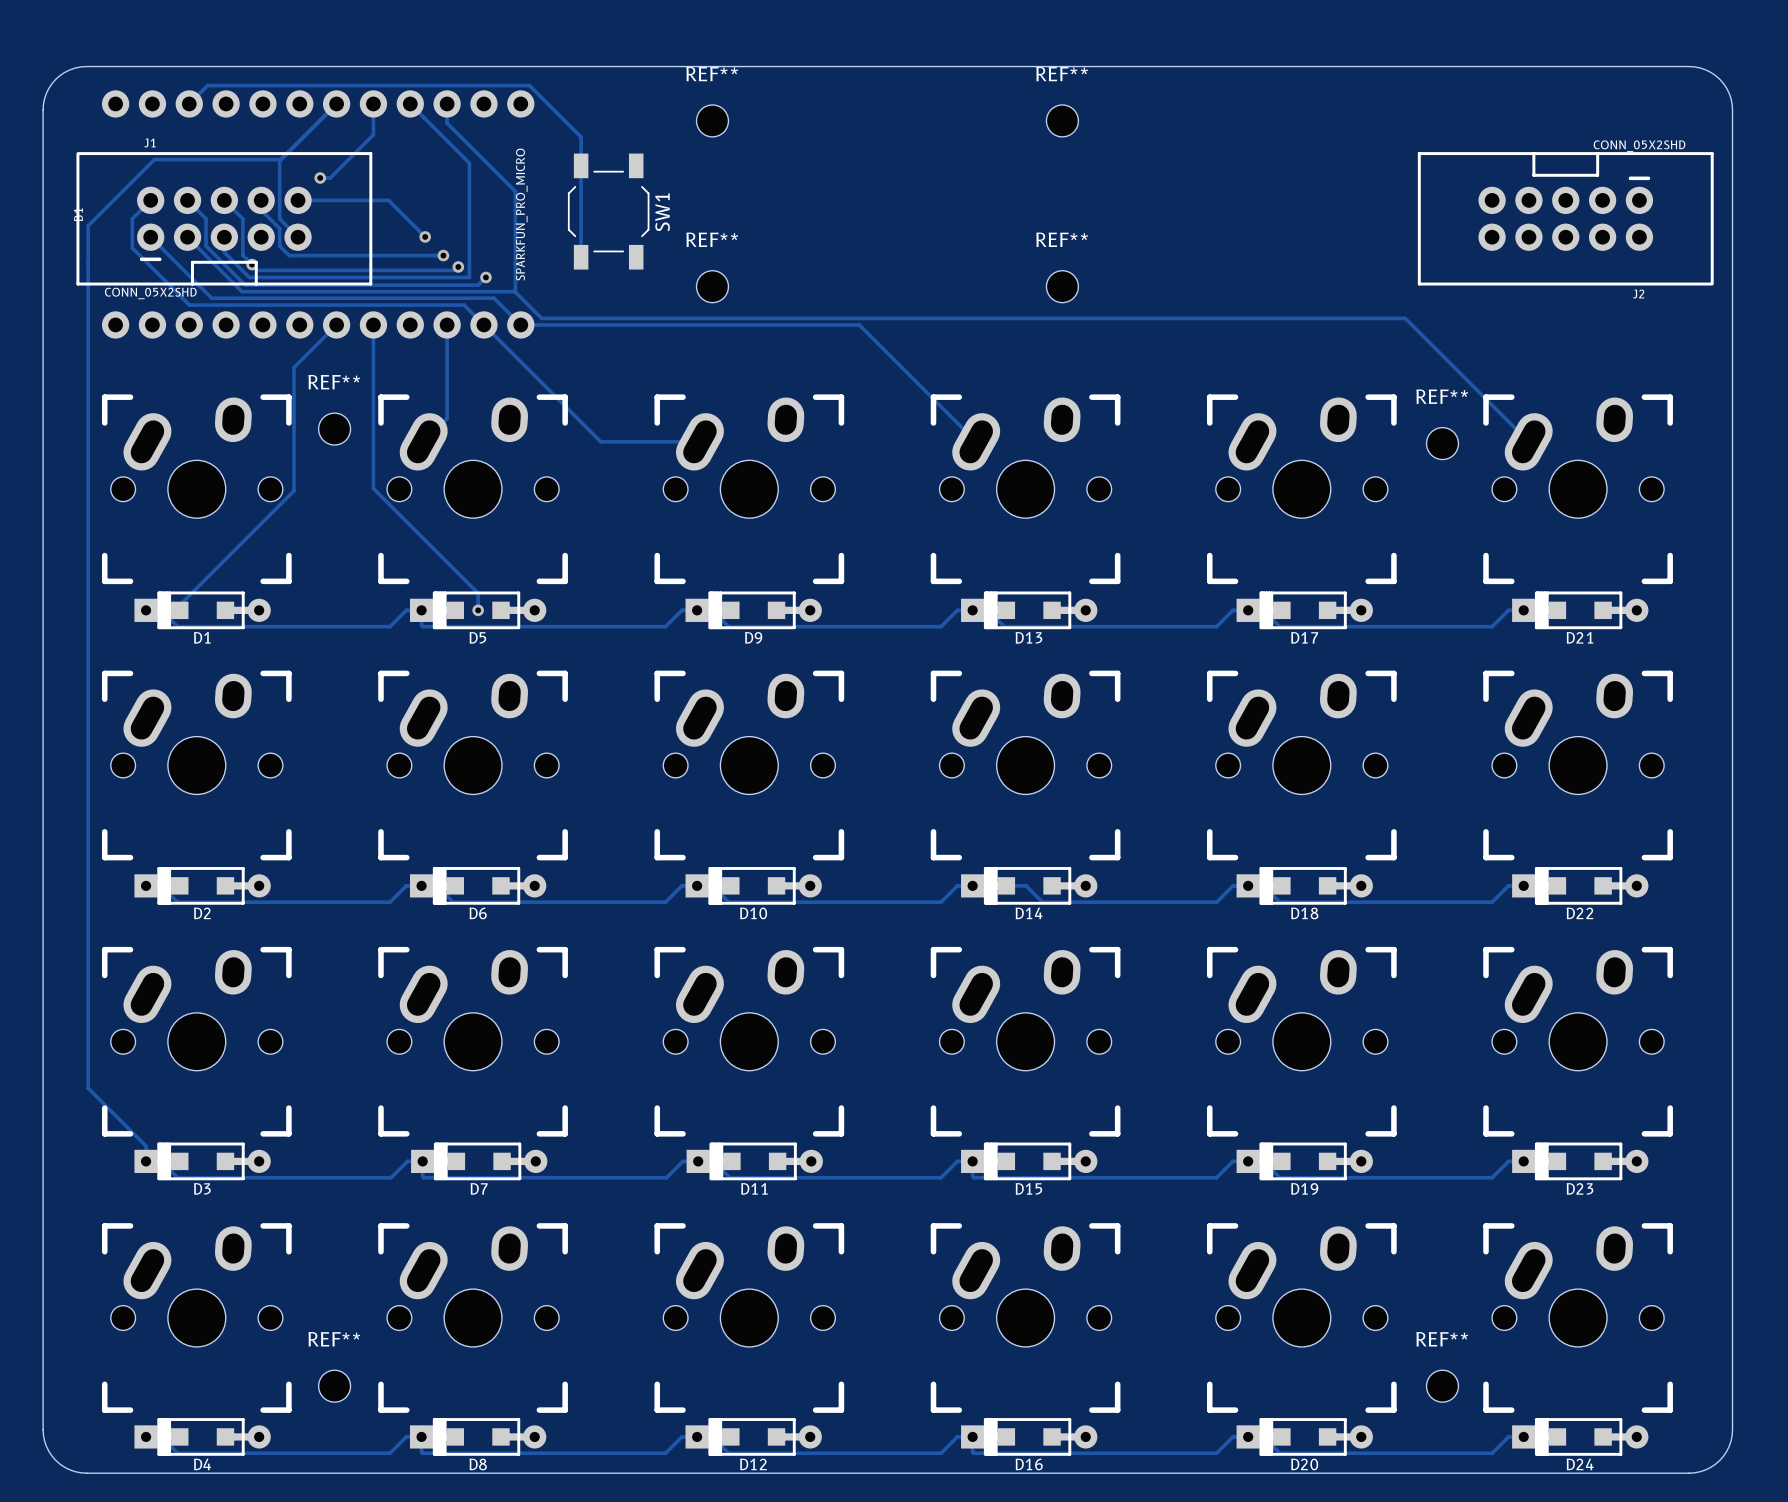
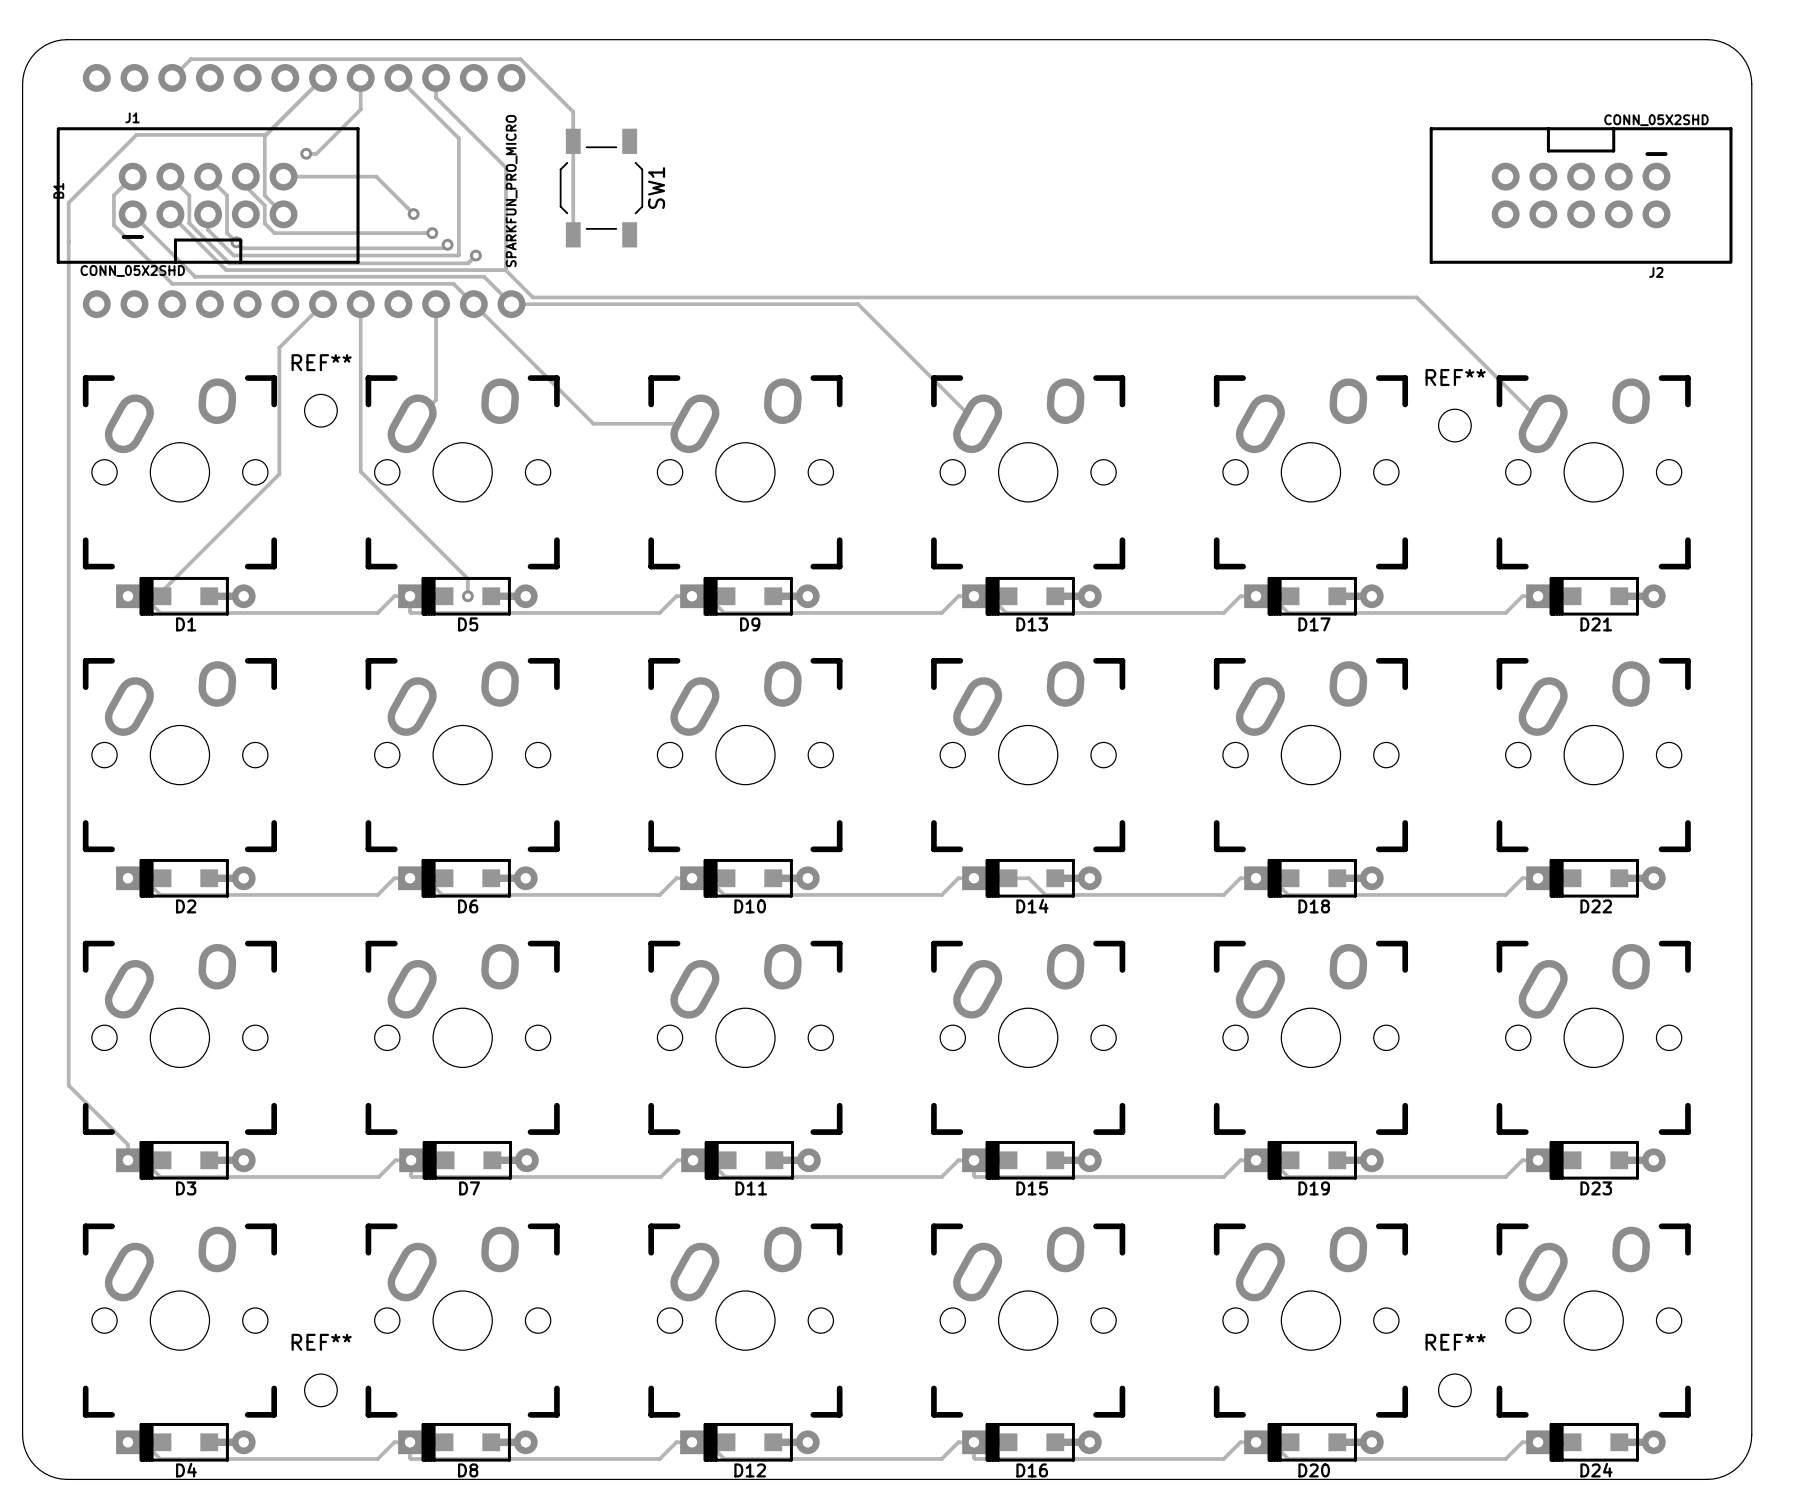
REF**: (712, 120) -> none
REF**: (1062, 120) -> none
REF**: (712, 286) -> none
REF**: (1062, 286) -> none

